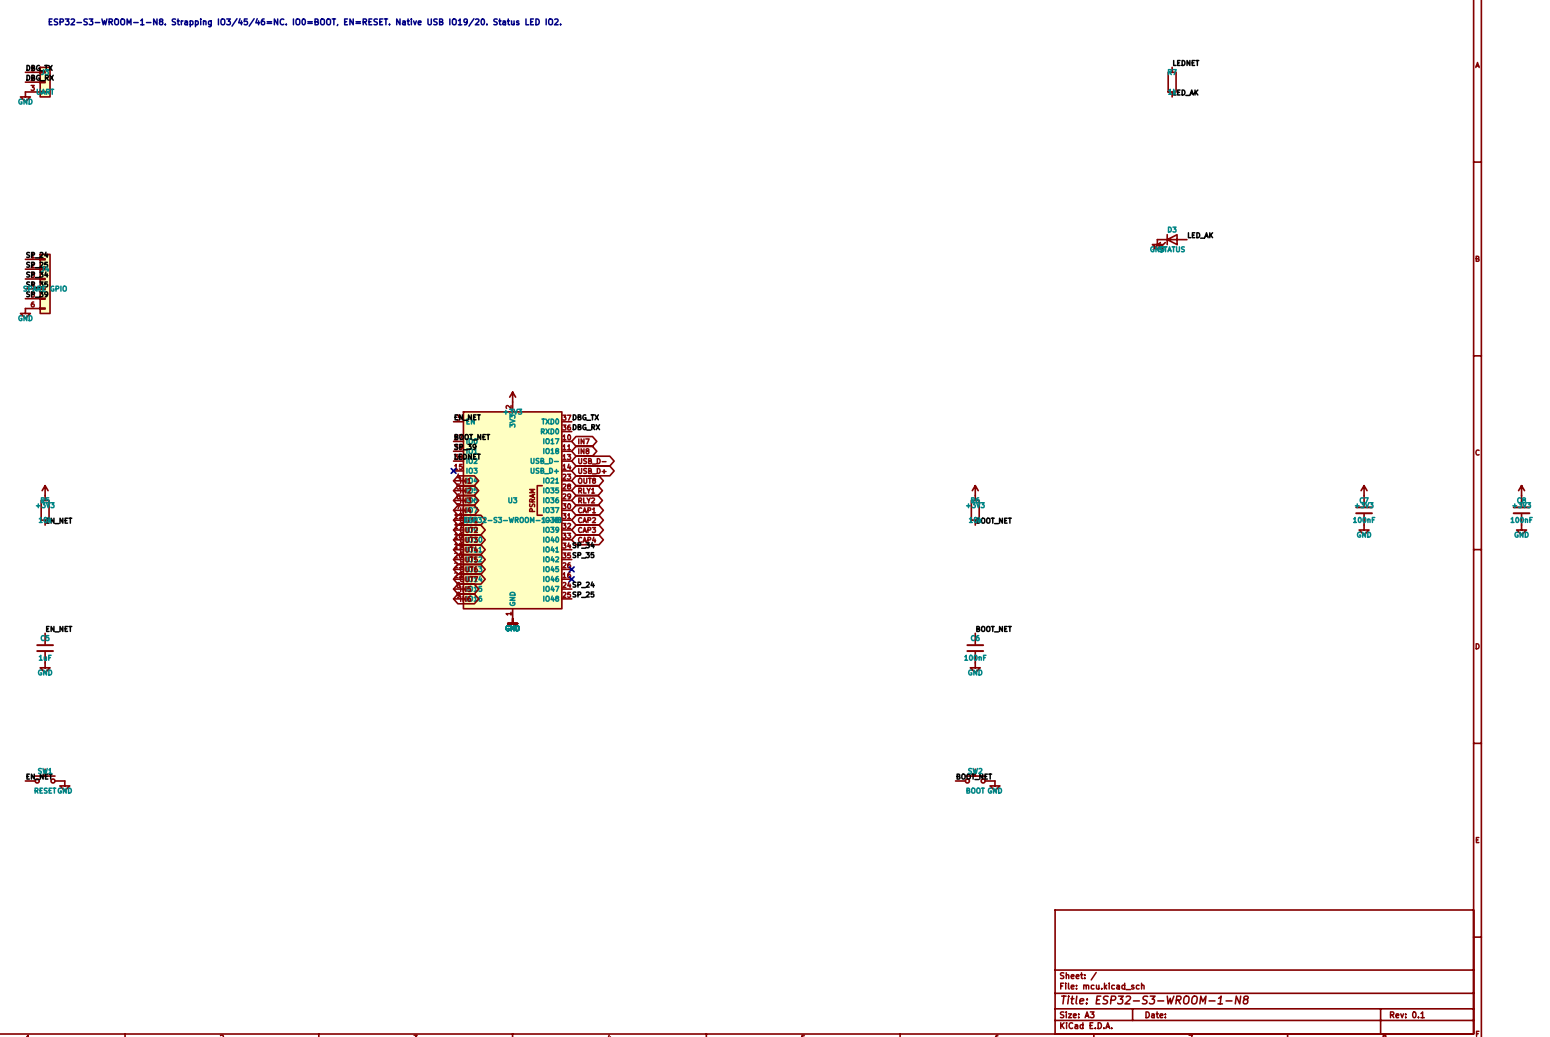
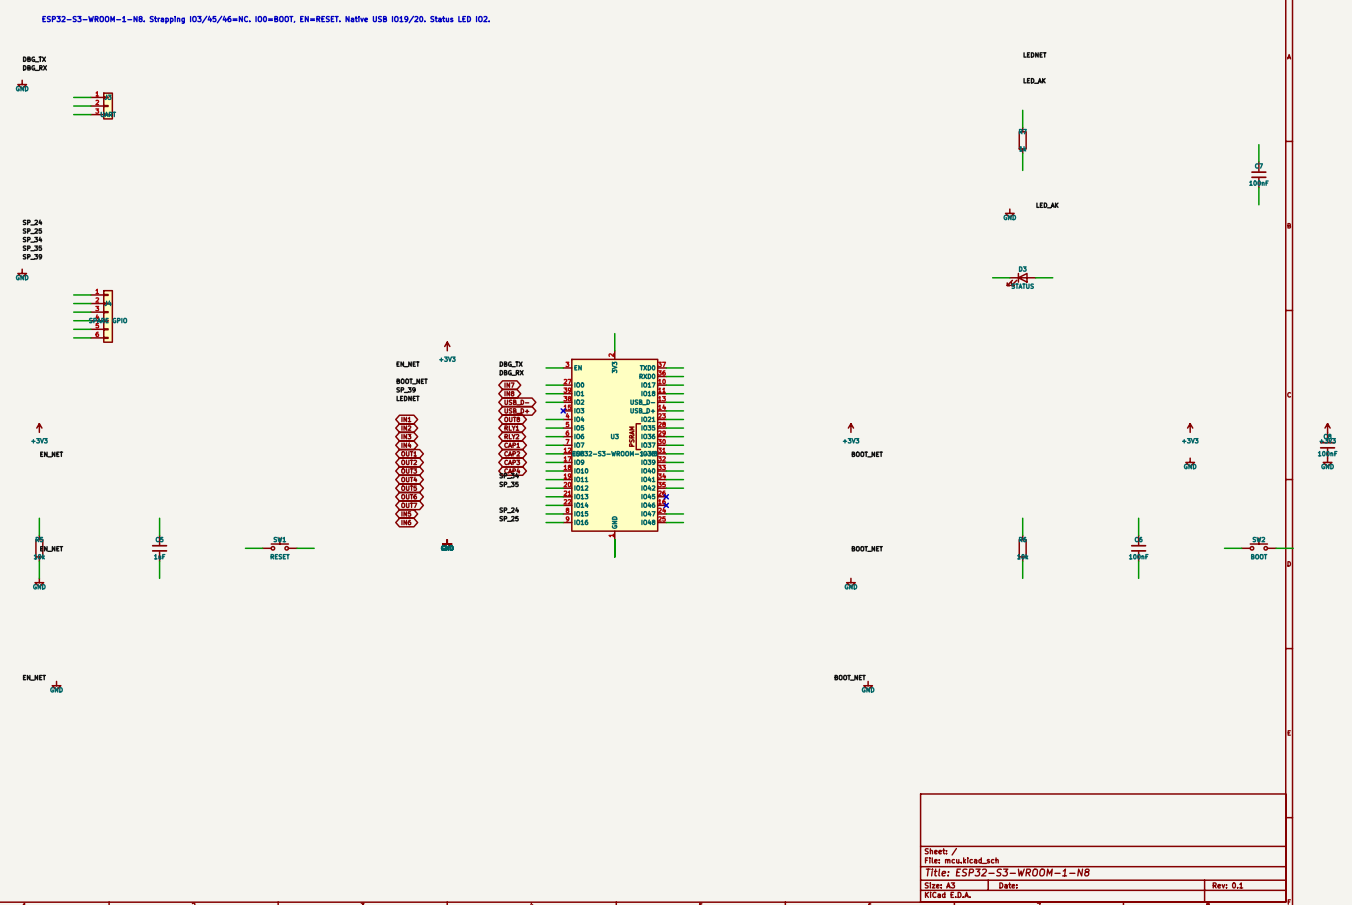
part position: (37, 82) -> (101, 106)
part position: (1172, 82) -> (1022, 140)
wire: none -> (73, 97) (90, 97)
wire: none -> (73, 106) (90, 106)
wire: none -> (1022, 110) (1022, 127)
wire: none -> (73, 114) (90, 114)
wire: none -> (1258, 144) (1258, 161)
wire: none -> (1022, 153) (1022, 170)
wire: none -> (1258, 187) (1258, 204)
part position: (1170, 241) -> (1021, 279)
part position: (37, 283) -> (101, 316)
wire: none -> (992, 277) (1009, 277)
wire: none -> (1035, 277) (1052, 277)
wire: none -> (73, 294) (90, 294)
wire: none -> (73, 303) (90, 303)
wire: none -> (73, 312) (90, 312)
wire: none -> (73, 320) (90, 320)
wire: none -> (73, 329) (90, 329)
wire: none -> (614, 333) (614, 350)
wire: none -> (73, 337) (90, 337)
wire: none -> (546, 367) (563, 367)
wire: none -> (666, 367) (683, 367)
wire: none -> (666, 376) (683, 376)
wire: none -> (546, 385) (563, 385)
wire: none -> (666, 385) (683, 385)
wire: none -> (546, 393) (563, 393)
wire: none -> (666, 393) (683, 393)
wire: none -> (546, 402) (563, 402)
wire: none -> (666, 402) (683, 402)
no-connect mark: (453, 470) -> none
no-connect mark: none -> (563, 410)
wire: none -> (666, 410) (683, 410)
wire: none -> (546, 419) (563, 419)
wire: none -> (666, 419) (683, 419)
wire: none -> (546, 428) (563, 428)
wire: none -> (666, 428) (683, 428)
wire: none -> (546, 436) (563, 436)
wire: none -> (666, 436) (683, 436)
part position: (45, 510) -> (39, 548)
part position: (512, 510) -> (614, 445)
wire: none -> (546, 445) (563, 445)
wire: none -> (666, 445) (683, 445)
part position: (975, 510) -> (1022, 548)
part position: (1364, 510) -> (1258, 174)
wire: none -> (546, 453) (563, 453)
wire: none -> (666, 453) (683, 453)
wire: none -> (546, 462) (563, 462)
wire: none -> (666, 462) (683, 462)
wire: none -> (546, 471) (563, 471)
wire: none -> (666, 471) (683, 471)
wire: none -> (546, 479) (563, 479)
wire: none -> (666, 479) (683, 479)
wire: none -> (546, 488) (563, 488)
wire: none -> (666, 488) (683, 488)
no-connect mark: (571, 569) -> none
wire: none -> (546, 496) (563, 496)
no-connect mark: none -> (666, 496)
no-connect mark: (571, 579) -> none
wire: none -> (546, 505) (563, 505)
no-connect mark: none -> (666, 505)
wire: none -> (546, 513) (563, 513)
wire: none -> (666, 513) (683, 513)
wire: none -> (39, 518) (39, 535)
wire: none -> (159, 518) (159, 535)
wire: none -> (1022, 518) (1022, 535)
wire: none -> (1138, 518) (1138, 535)
wire: none -> (546, 522) (563, 522)
wire: none -> (666, 522) (683, 522)
wire: none -> (614, 539) (614, 556)
wire: none -> (245, 548) (262, 548)
wire: none -> (296, 548) (314, 548)
wire: none -> (1224, 548) (1241, 548)
wire: none -> (1276, 548) (1293, 548)
wire: none -> (159, 561) (159, 578)
wire: none -> (1022, 561) (1022, 578)
wire: none -> (1138, 561) (1138, 578)
part position: (45, 648) -> (159, 548)
part position: (975, 648) -> (1138, 548)
part position: (45, 776) -> (279, 544)
part position: (975, 776) -> (1258, 544)

